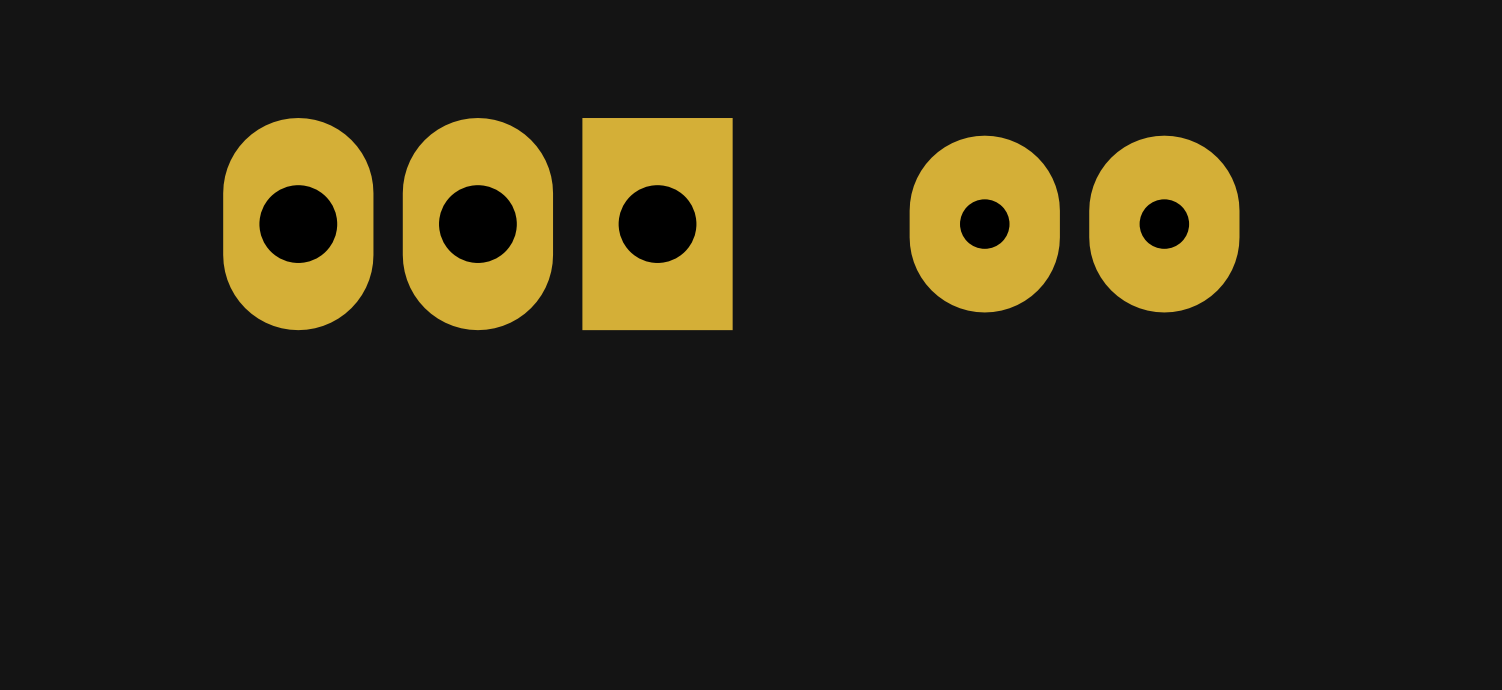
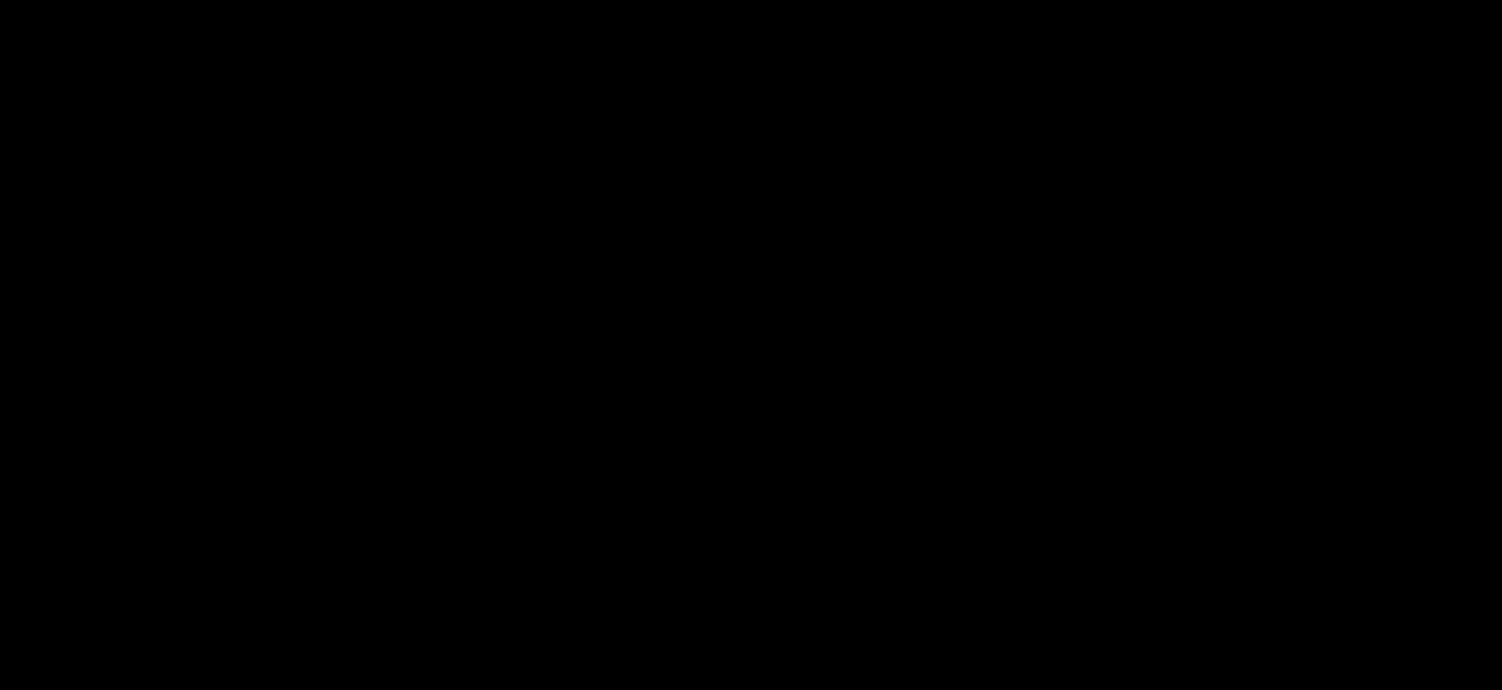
part: (477, 224) -> none
part: (1074, 224) -> none

